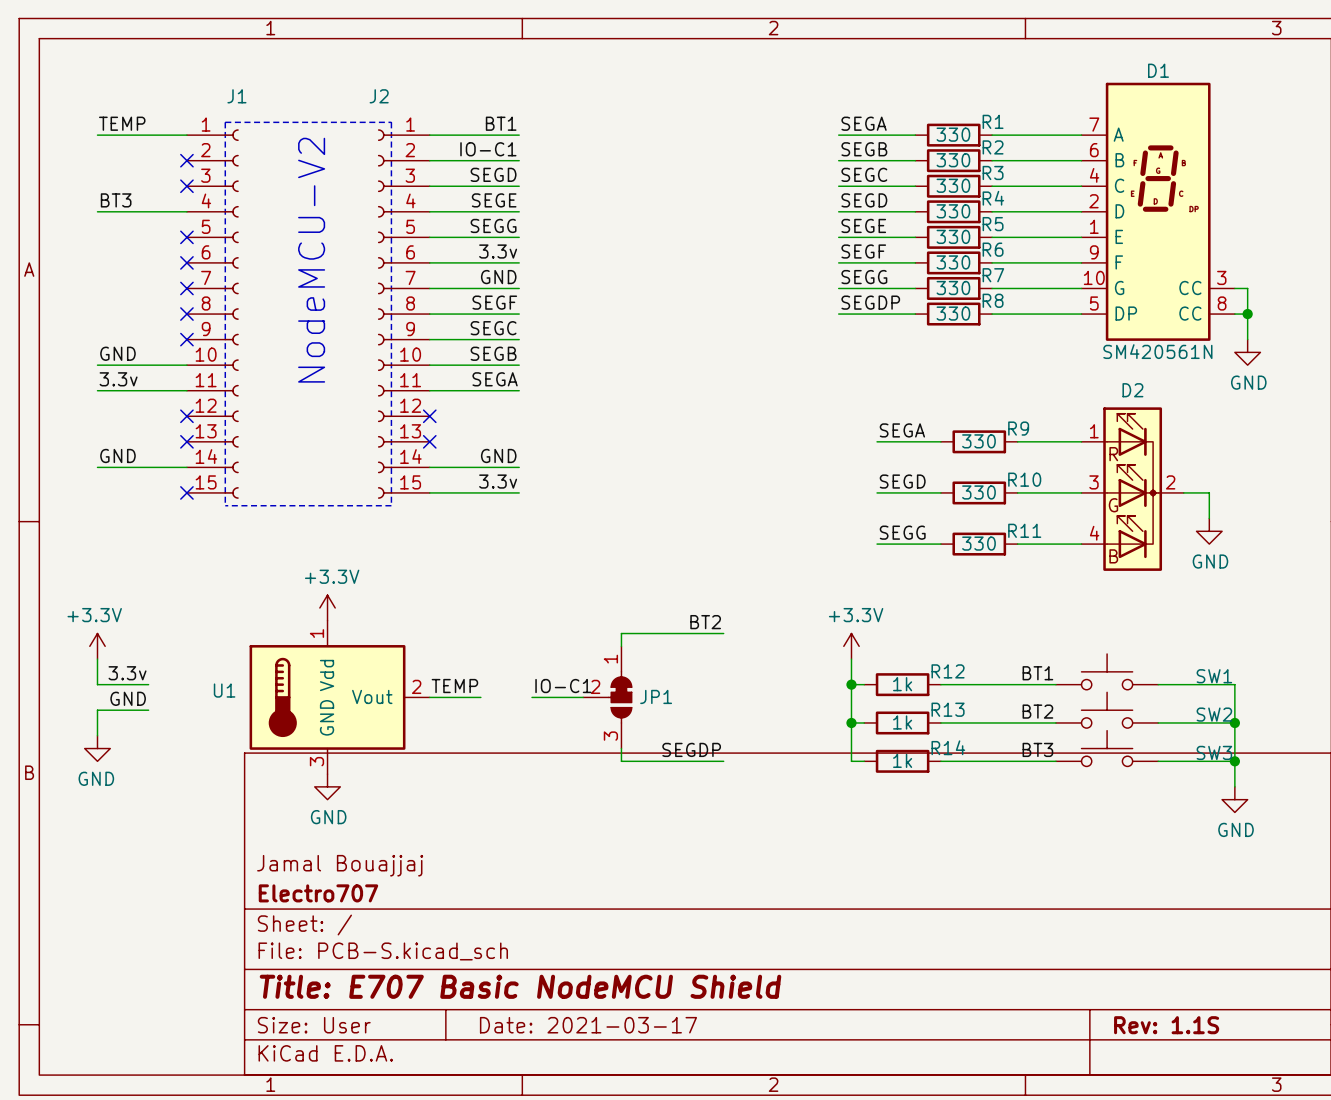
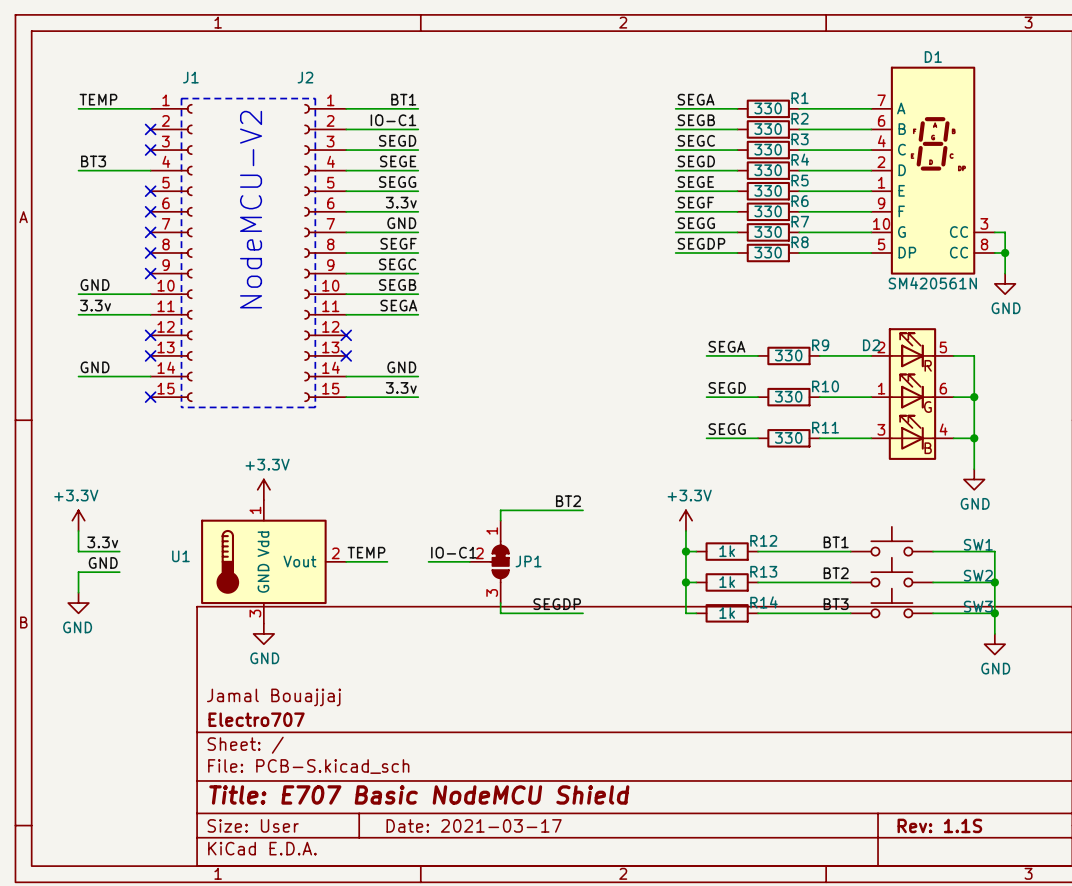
D2 name position: D2 (1132, 390) -> D2 (871, 345)
D2 symbol: [1081, 407, 1184, 571] -> [871, 328, 954, 460]
wire: none -> (953, 355) (974, 355) (974, 397)
junction: none -> (974, 397)
wire: none -> (974, 417) (974, 469)
power symbol position: GND (1209, 531) -> GND (974, 479)
wire: none -> (953, 438) (974, 438)
junction: none -> (974, 438)

